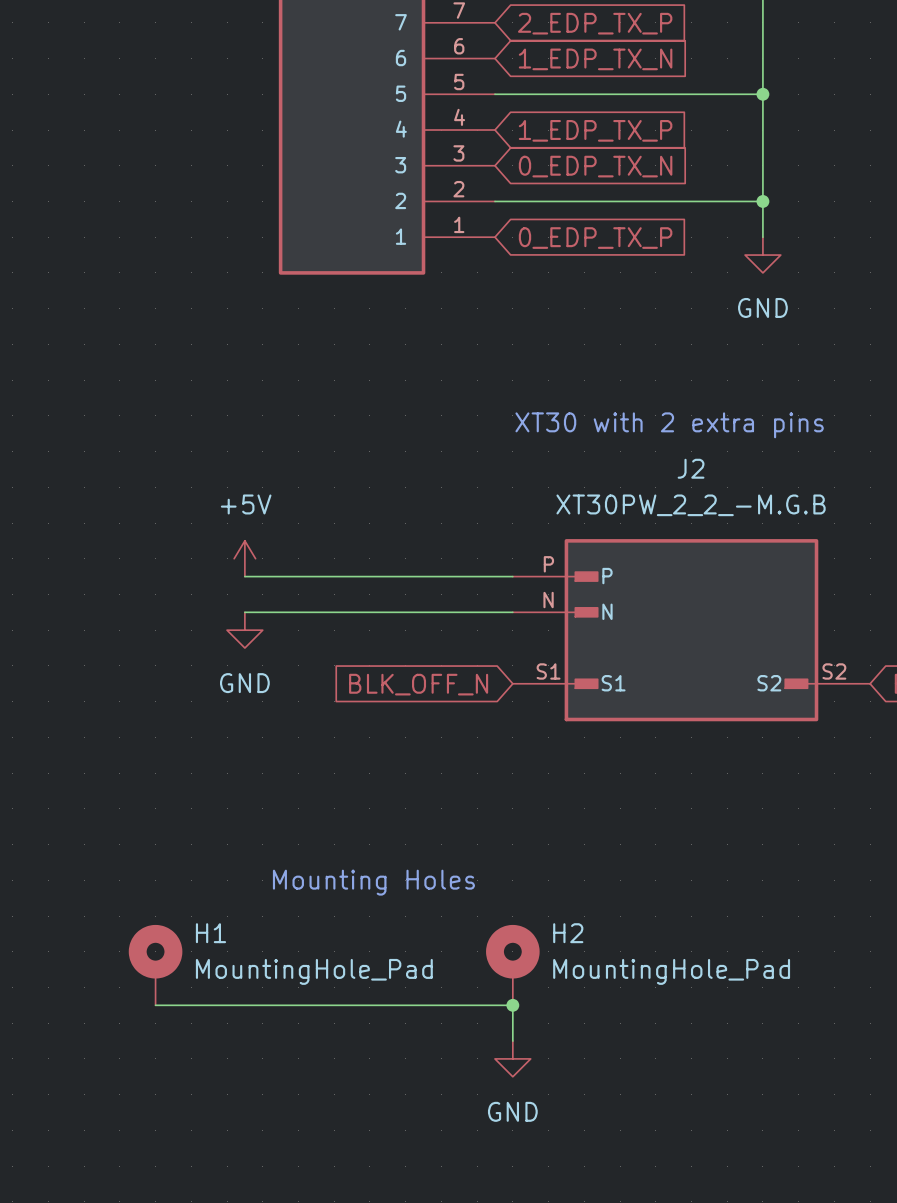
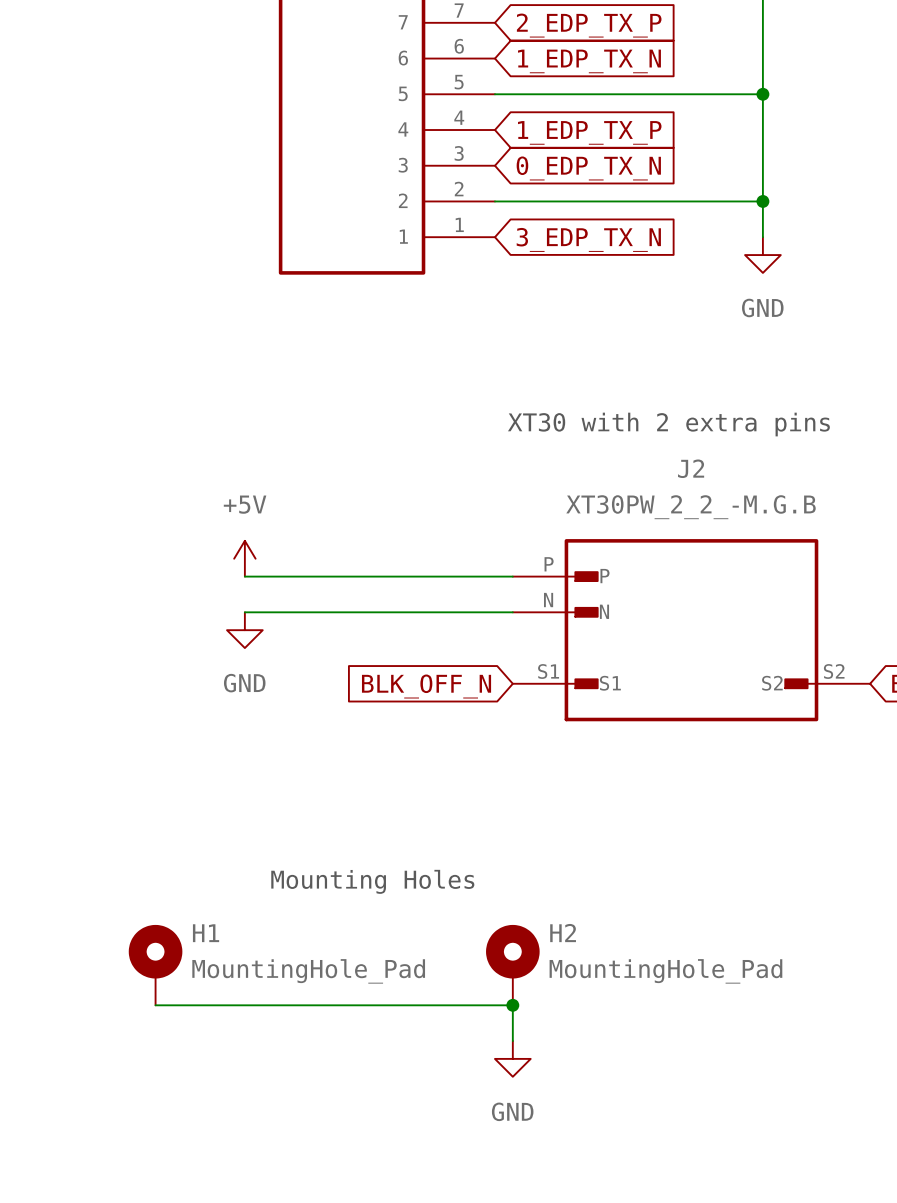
global label: 0_EDP_TX_P (595, 238) -> 3_EDP_TX_N (588, 239)

